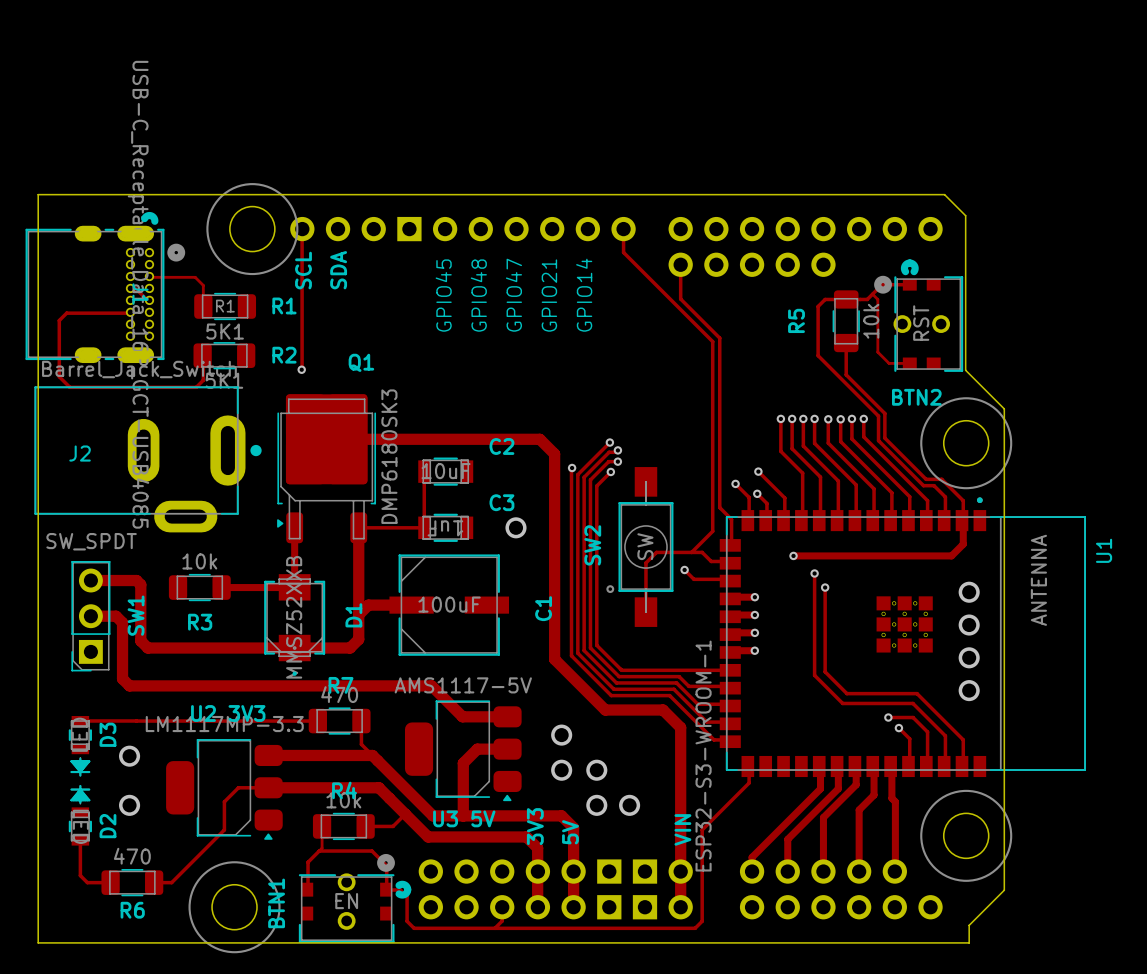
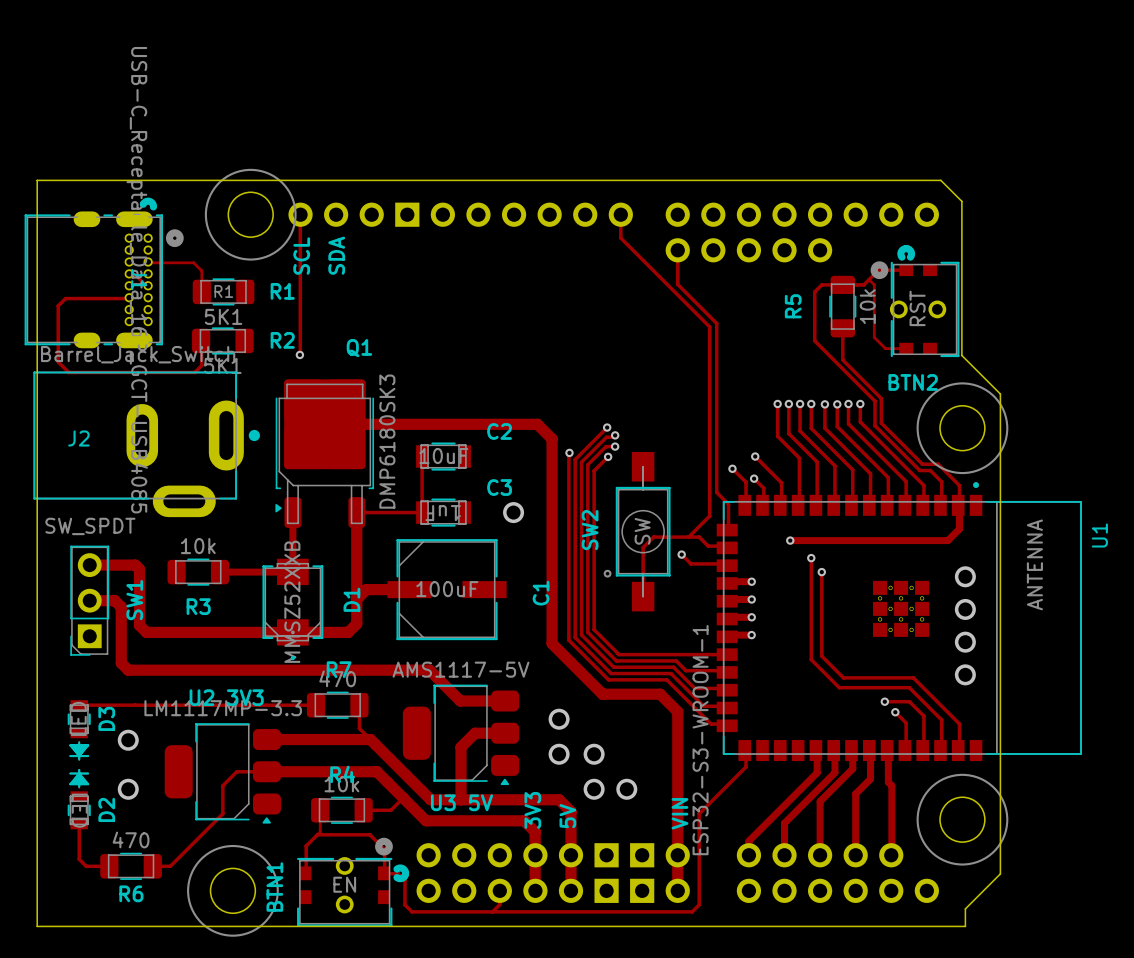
text: GPIO45 (443, 295) -> none
text: GPIO48 (478, 295) -> none
text: GPIO47 (513, 295) -> none
text: GPIO21 (549, 295) -> none
text: GPIO14 (584, 295) -> none

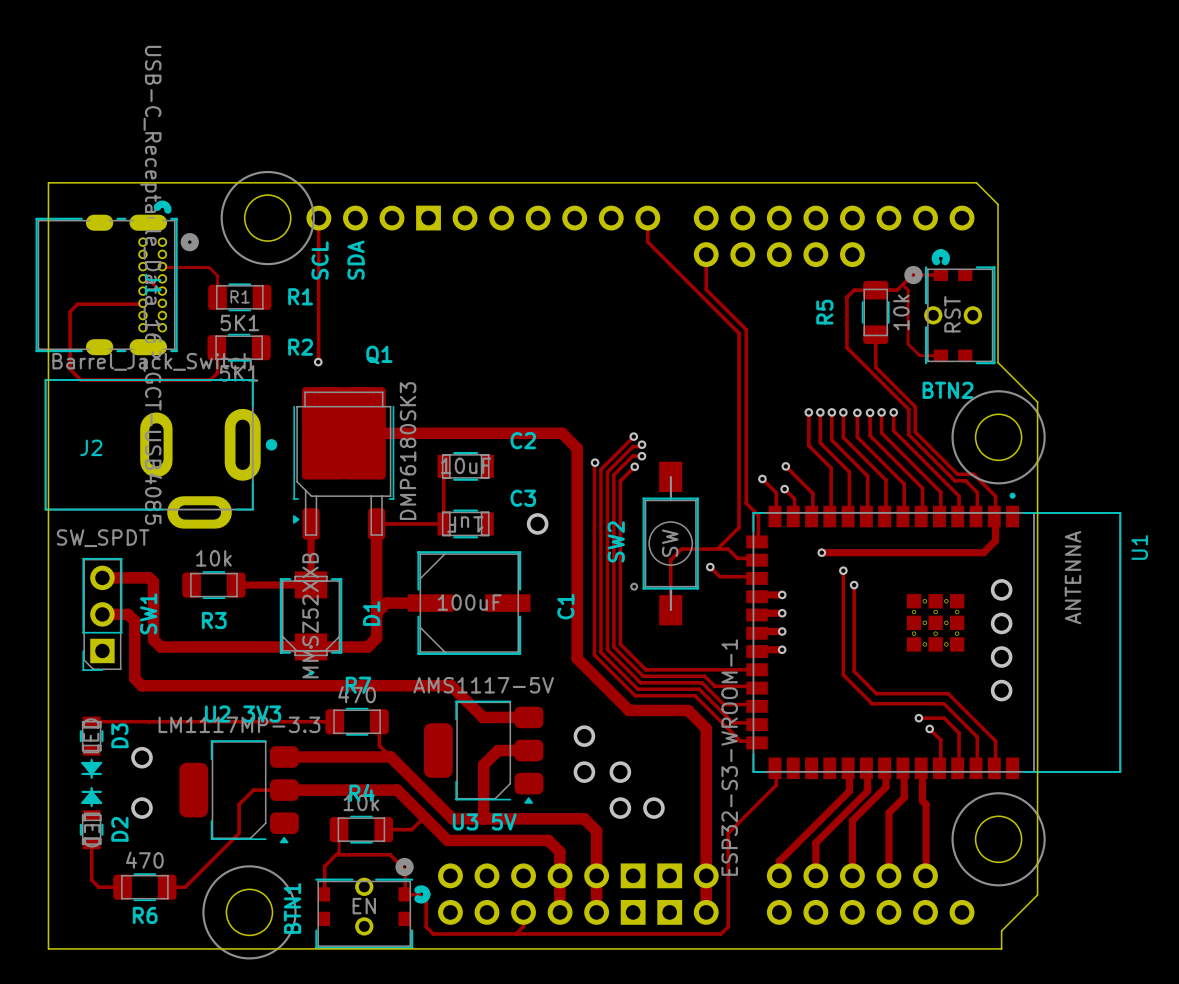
text: 3V3 (532, 810) -> none
text: VIN (679, 813) -> none
text: 5V (567, 816) -> none

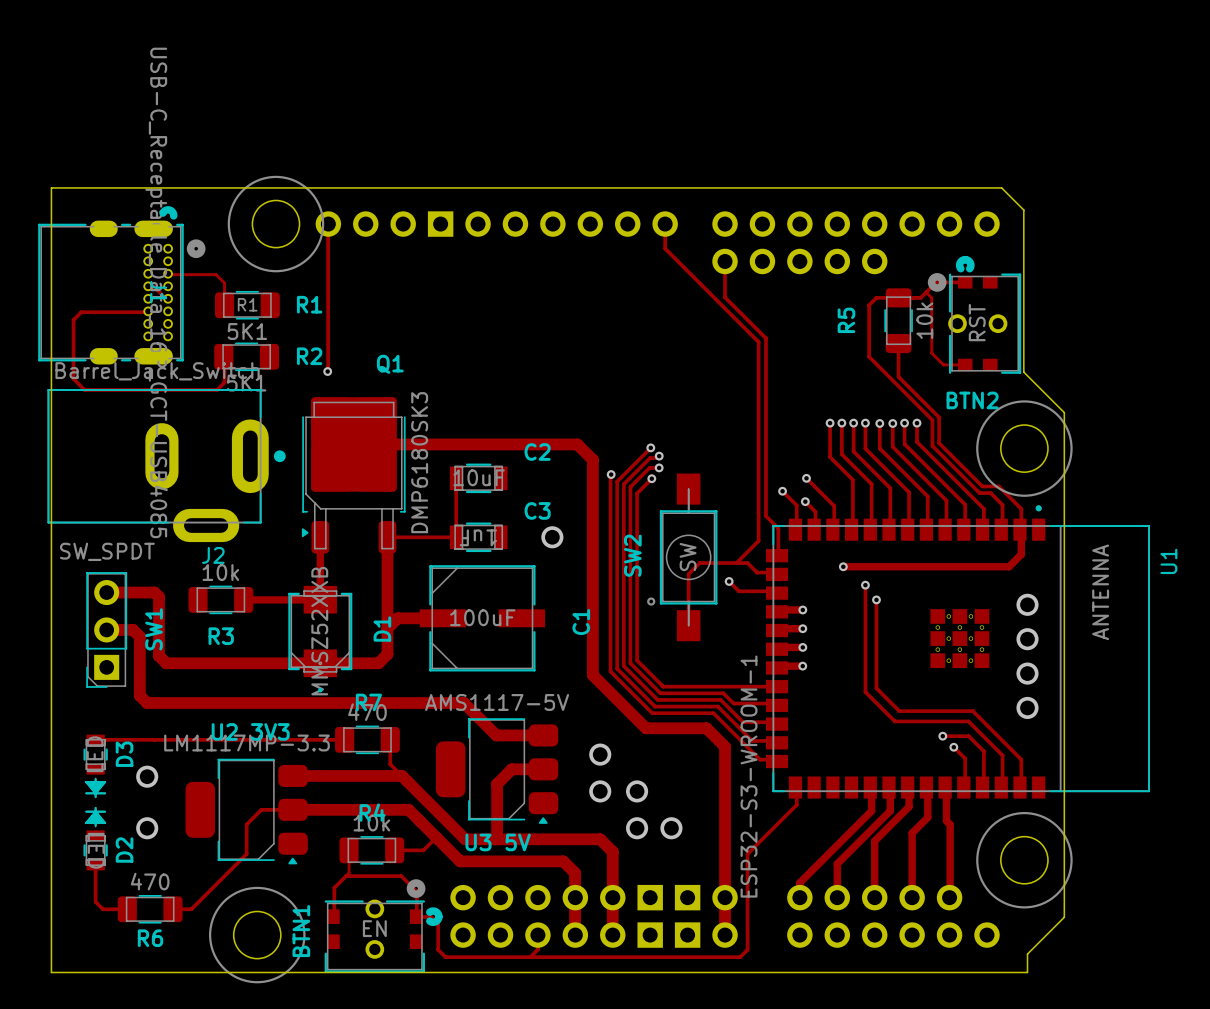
text: SCL (320, 260) -> none
text: SDA (356, 260) -> none
J2 name position: J2 (91, 447) -> J2 (213, 555)

